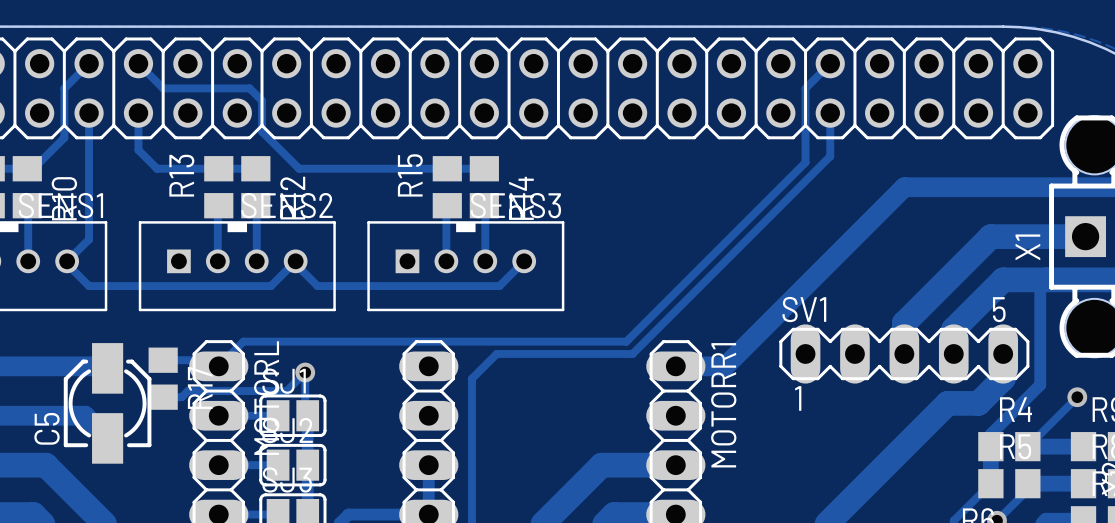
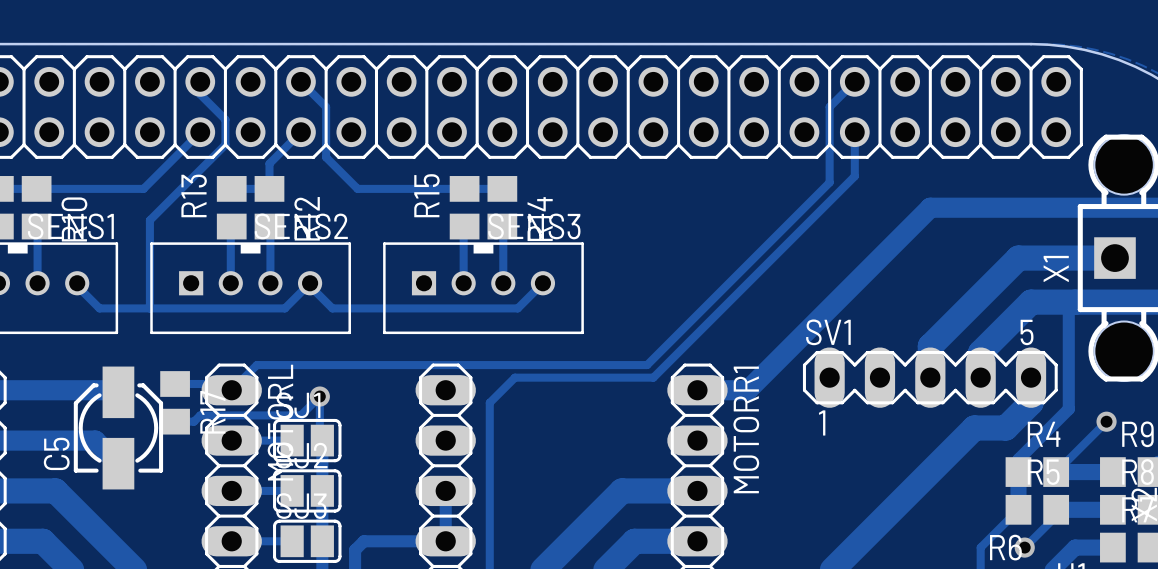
track: (89, 63) (64, 88) (64, 137) (33, 168) -> (200, 132) (143, 188) (42, 188)
track: (138, 63) (163, 88) (249, 88) (262, 100) (262, 131) (299, 168) (342, 168) -> (300, 81) (326, 107) (326, 157) (357, 188)
track: none -> (200, 81) (200, 94) (225, 119) (225, 144) (149, 220) (149, 308)
track: (89, 113) (89, 239) (67, 261) -> none
track: (138, 113) (138, 150) (157, 168) (218, 168) -> none
track: none -> (300, 132) (269, 163) (269, 188)

